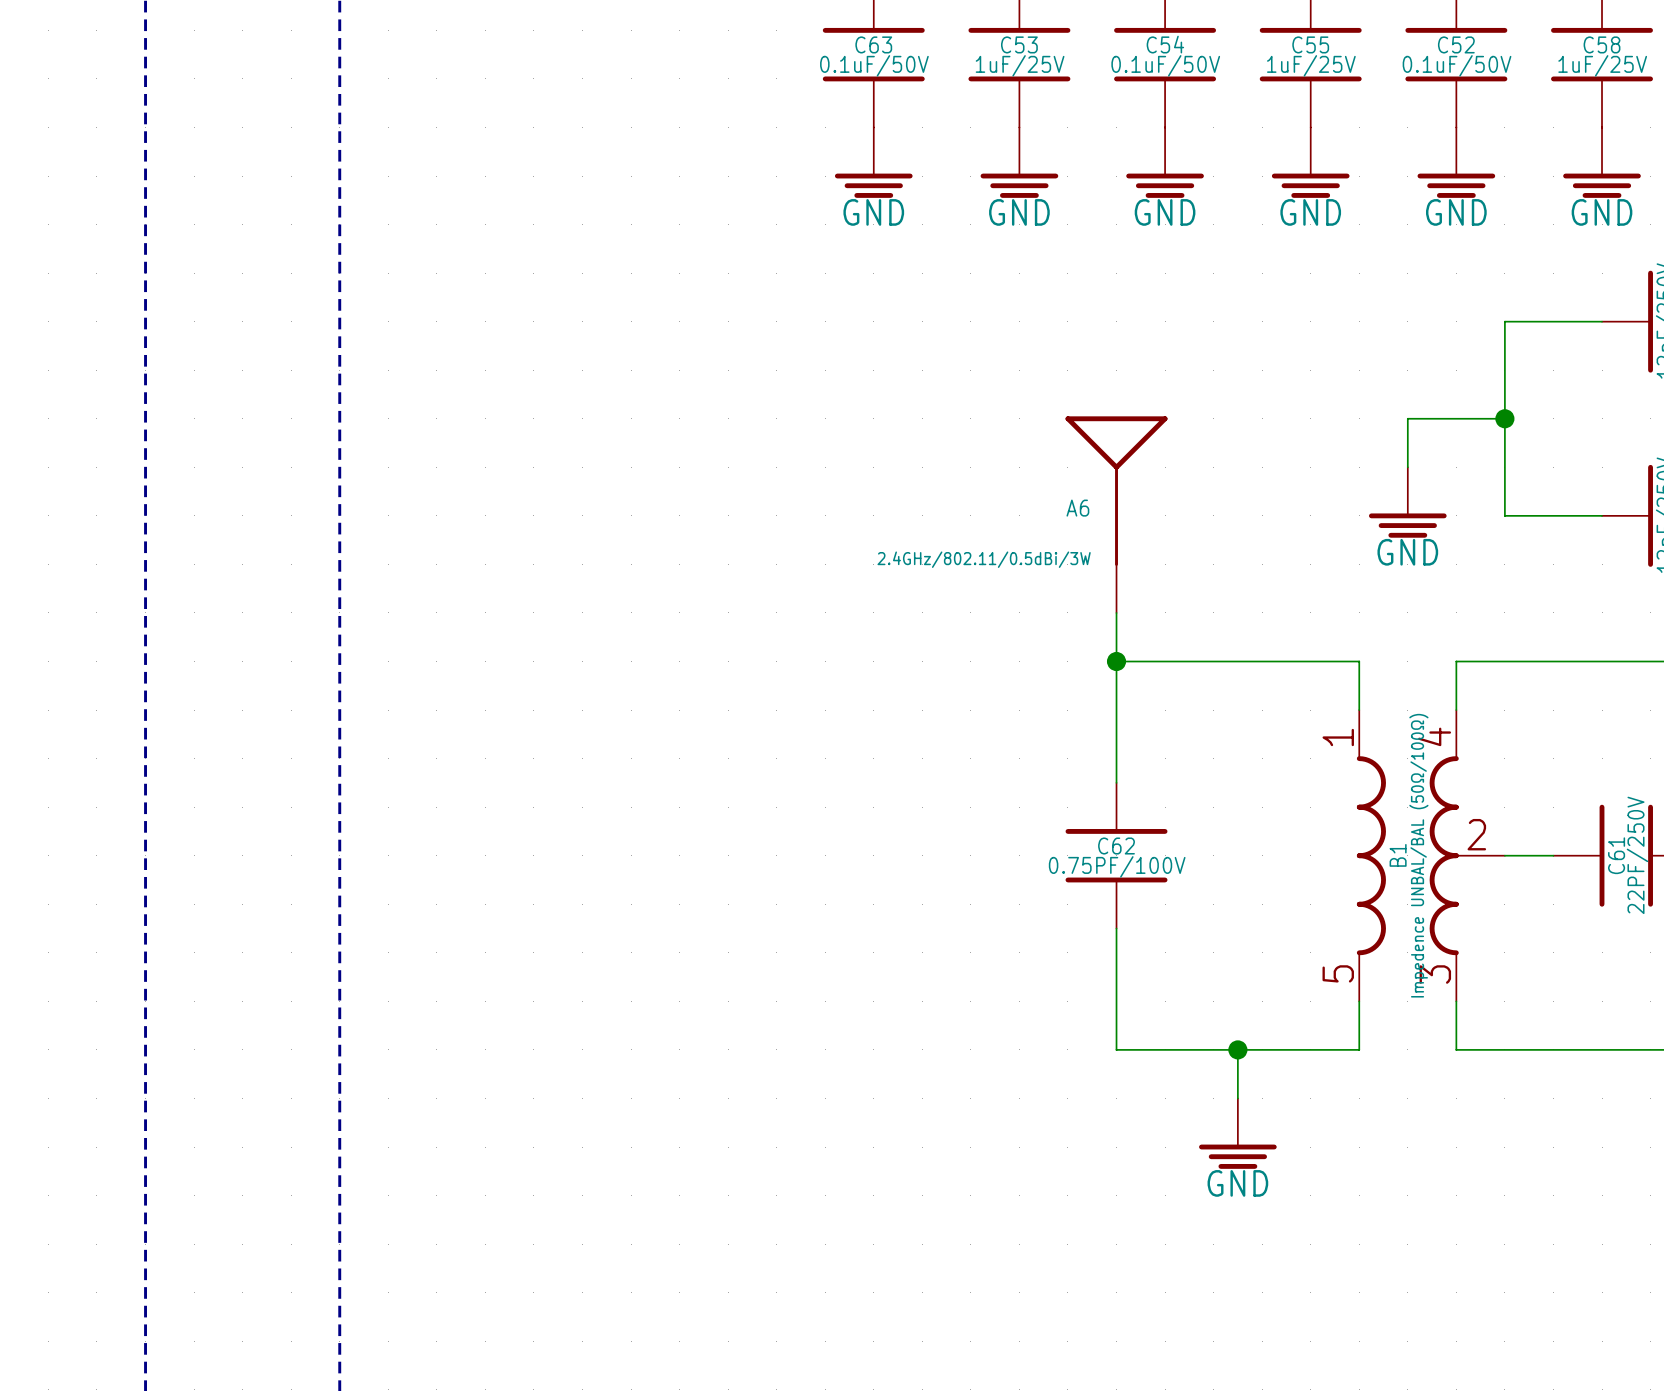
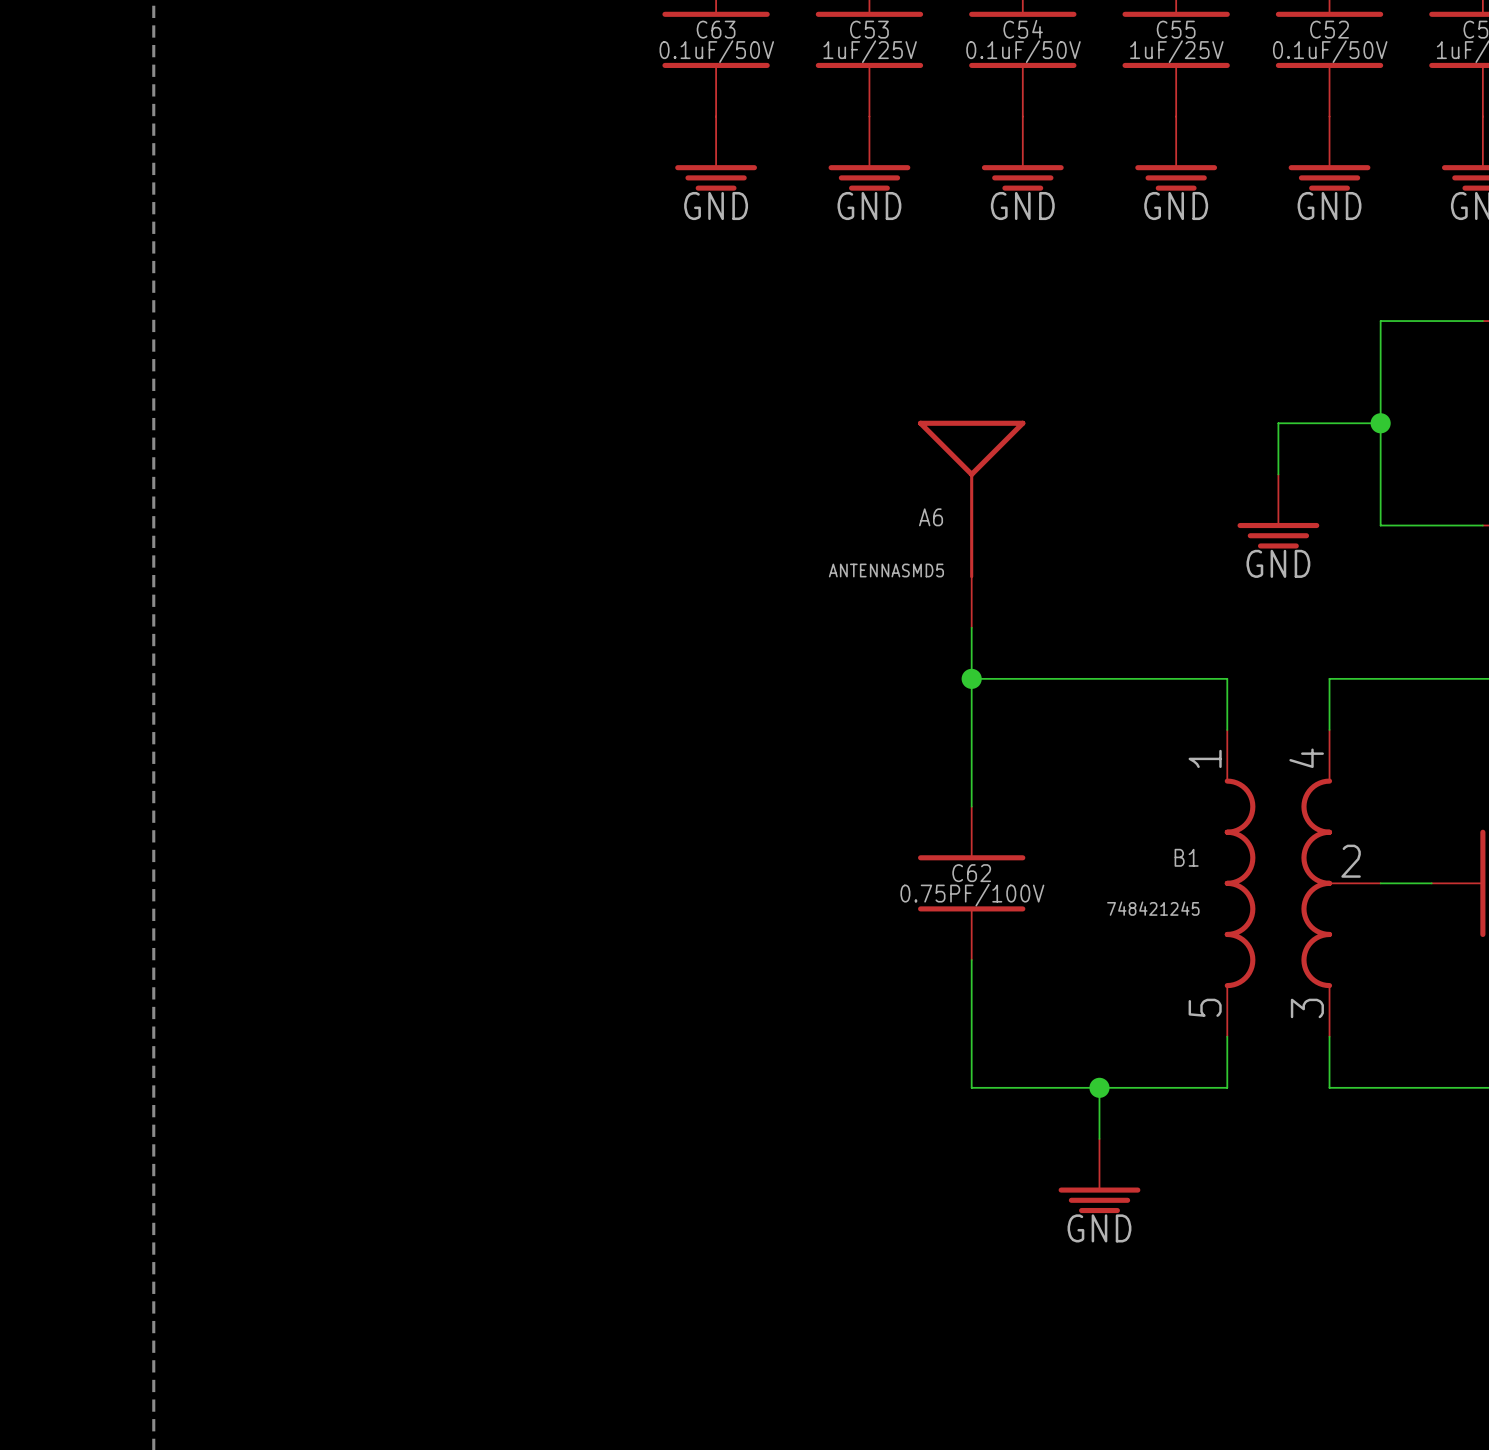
A6 value: 2.4GHz/802.11/0.5dBi/3W (984, 559) -> ANTENNASMD5 (886, 570)
B1 name rotation: 0° (1398, 855) -> 90° clockwise (1186, 857)
B1 name position: B1 (1398, 855) -> B1 (1186, 857)
B1 value: Impedence UNBAL/BAL (50Ω/100Ω) (1418, 855) -> 748421245 (1153, 908)

